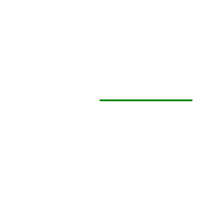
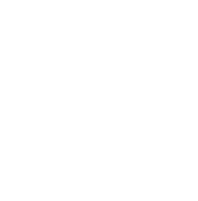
wire: (100, 100) (191, 100) -> none

